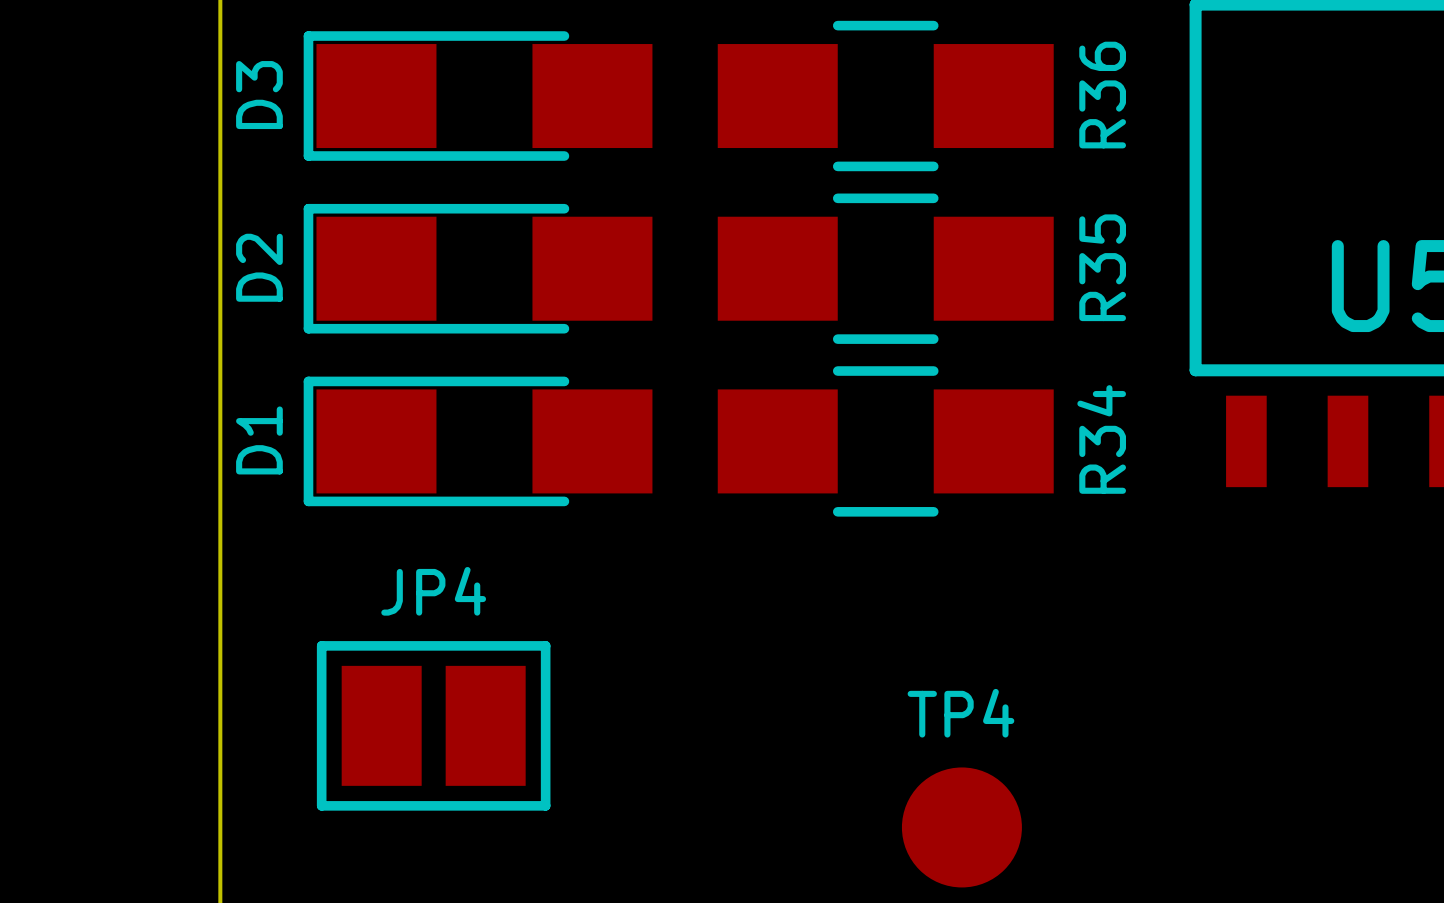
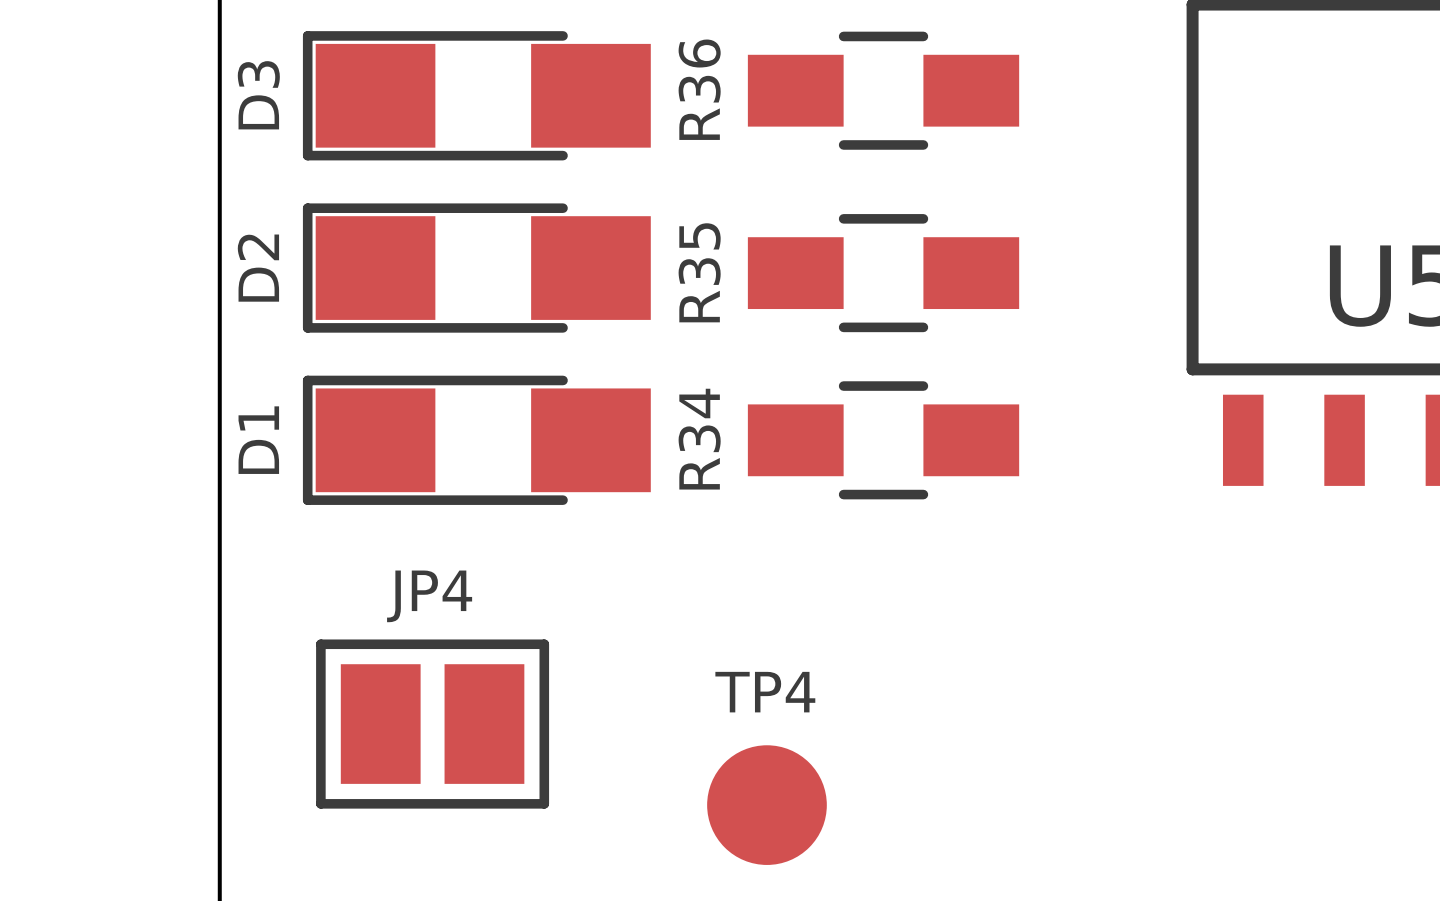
R36 footprint: [717, 20, 1054, 172] -> [747, 31, 1020, 150]
R36 name position: R36 (1102, 95) -> R36 (699, 89)
R35 footprint: [717, 193, 1054, 344] -> [747, 214, 1020, 333]
R35 name position: R35 (1102, 267) -> R35 (699, 272)
R34 footprint: [717, 366, 1054, 517] -> [747, 381, 1020, 500]
R34 name position: R34 (1101, 439) -> R34 (699, 439)
TP4 position: (961, 827) -> (766, 805)

